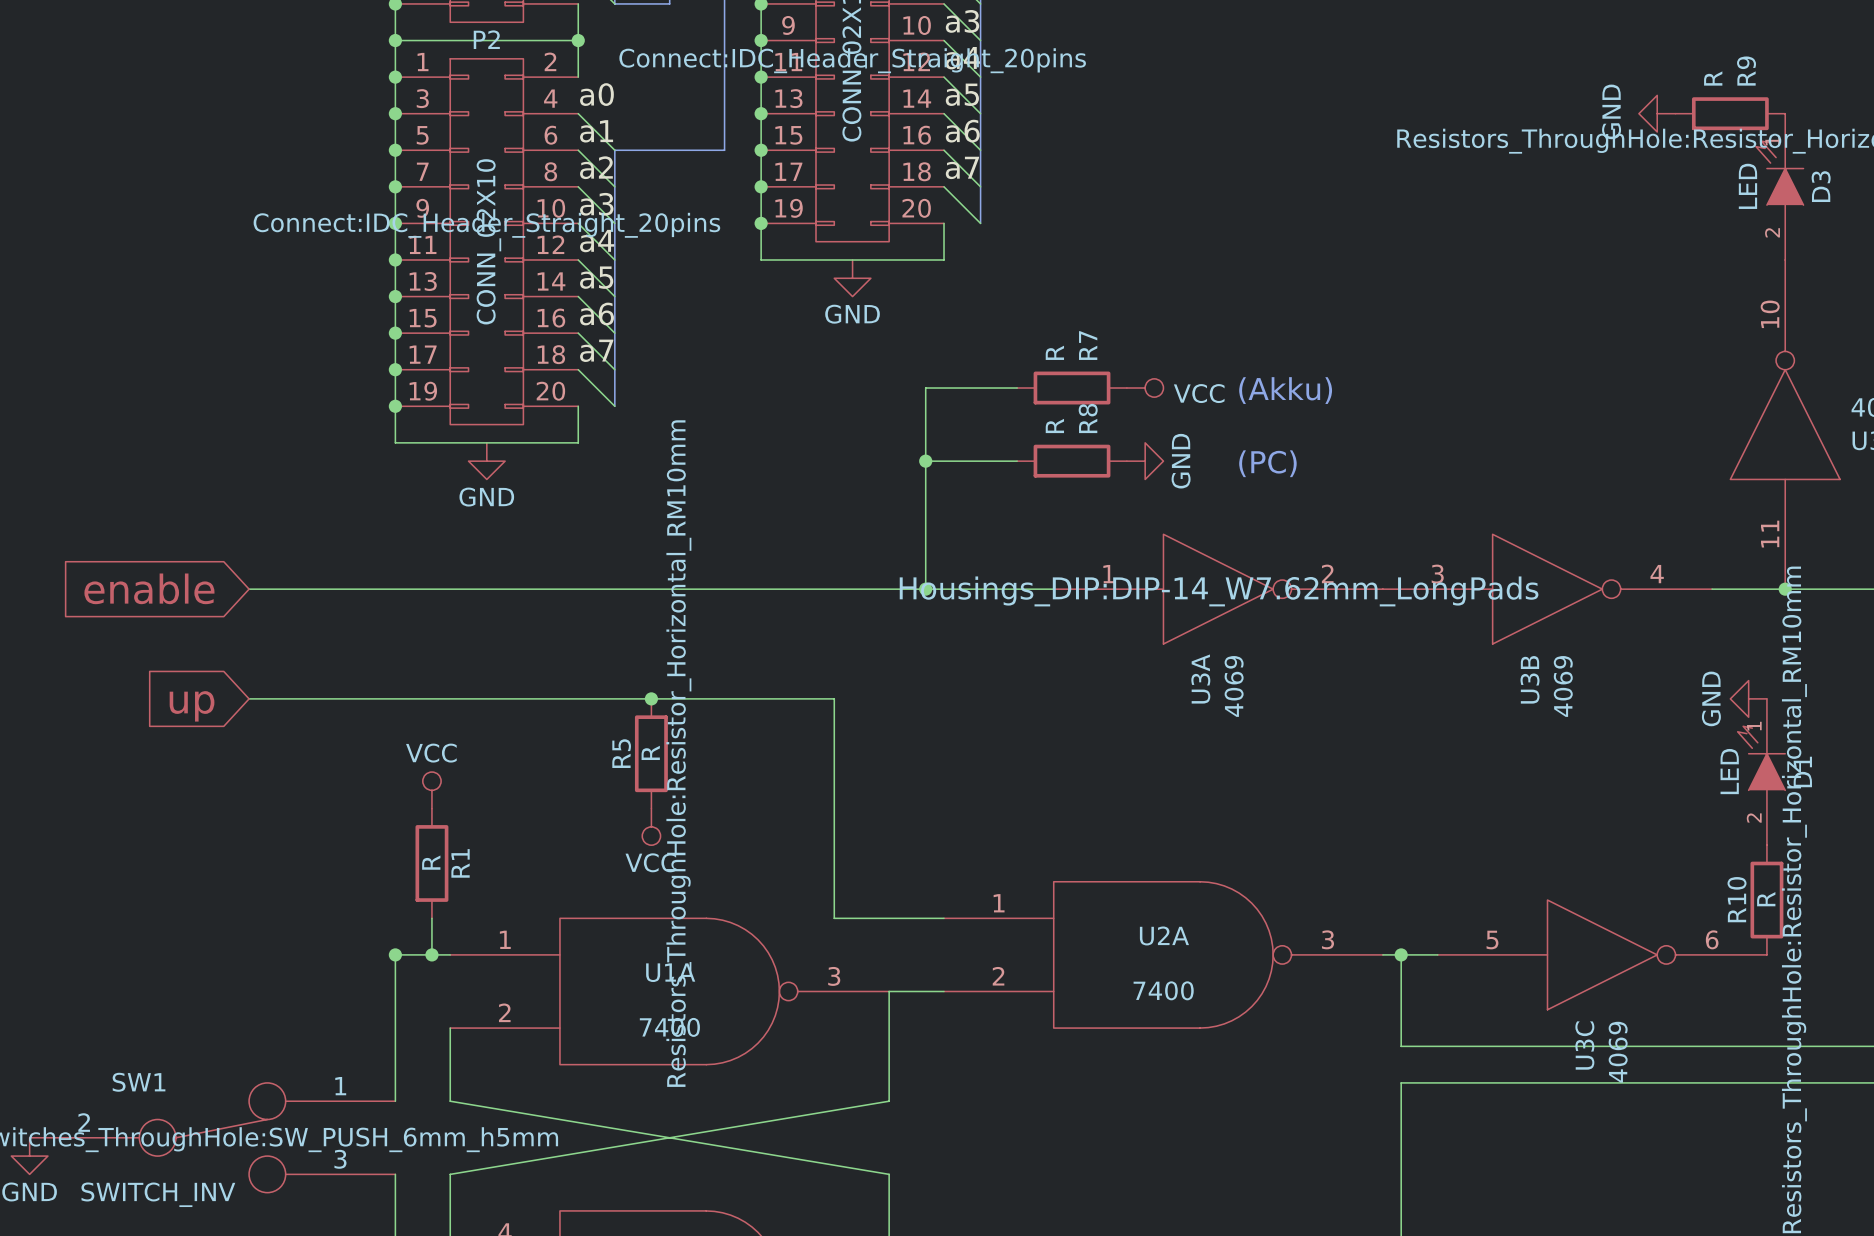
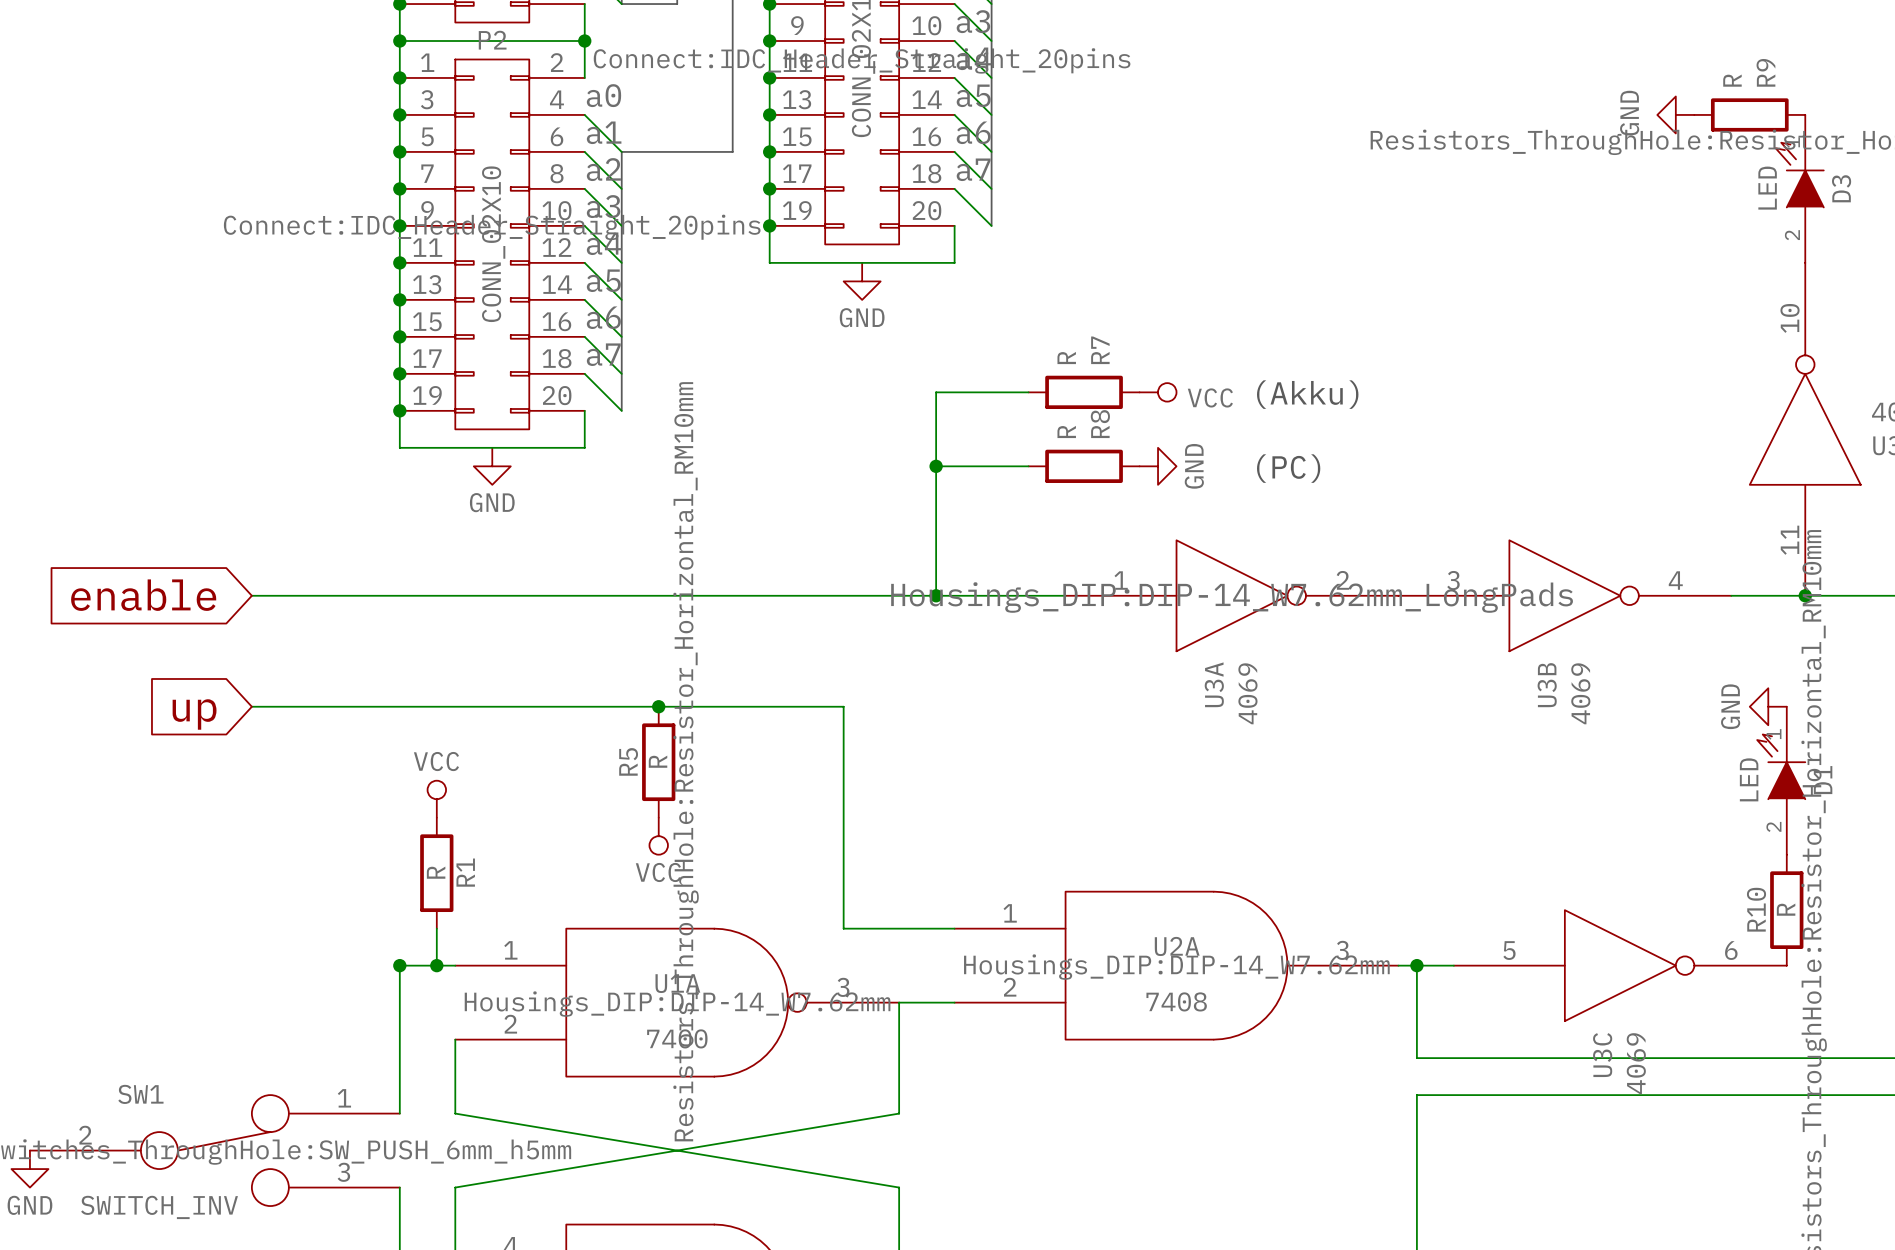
U2A symbol: [944, 881, 1383, 1029] -> [954, 891, 1399, 1040]
U2A text: none -> Housings_DIP:DIP-14_W7.62mm (1176, 967)
U2A value: 7400 (1163, 990) -> 7408 (1176, 1001)
U1A text: none -> Housings_DIP:DIP-14_W7.62mm (677, 1004)

